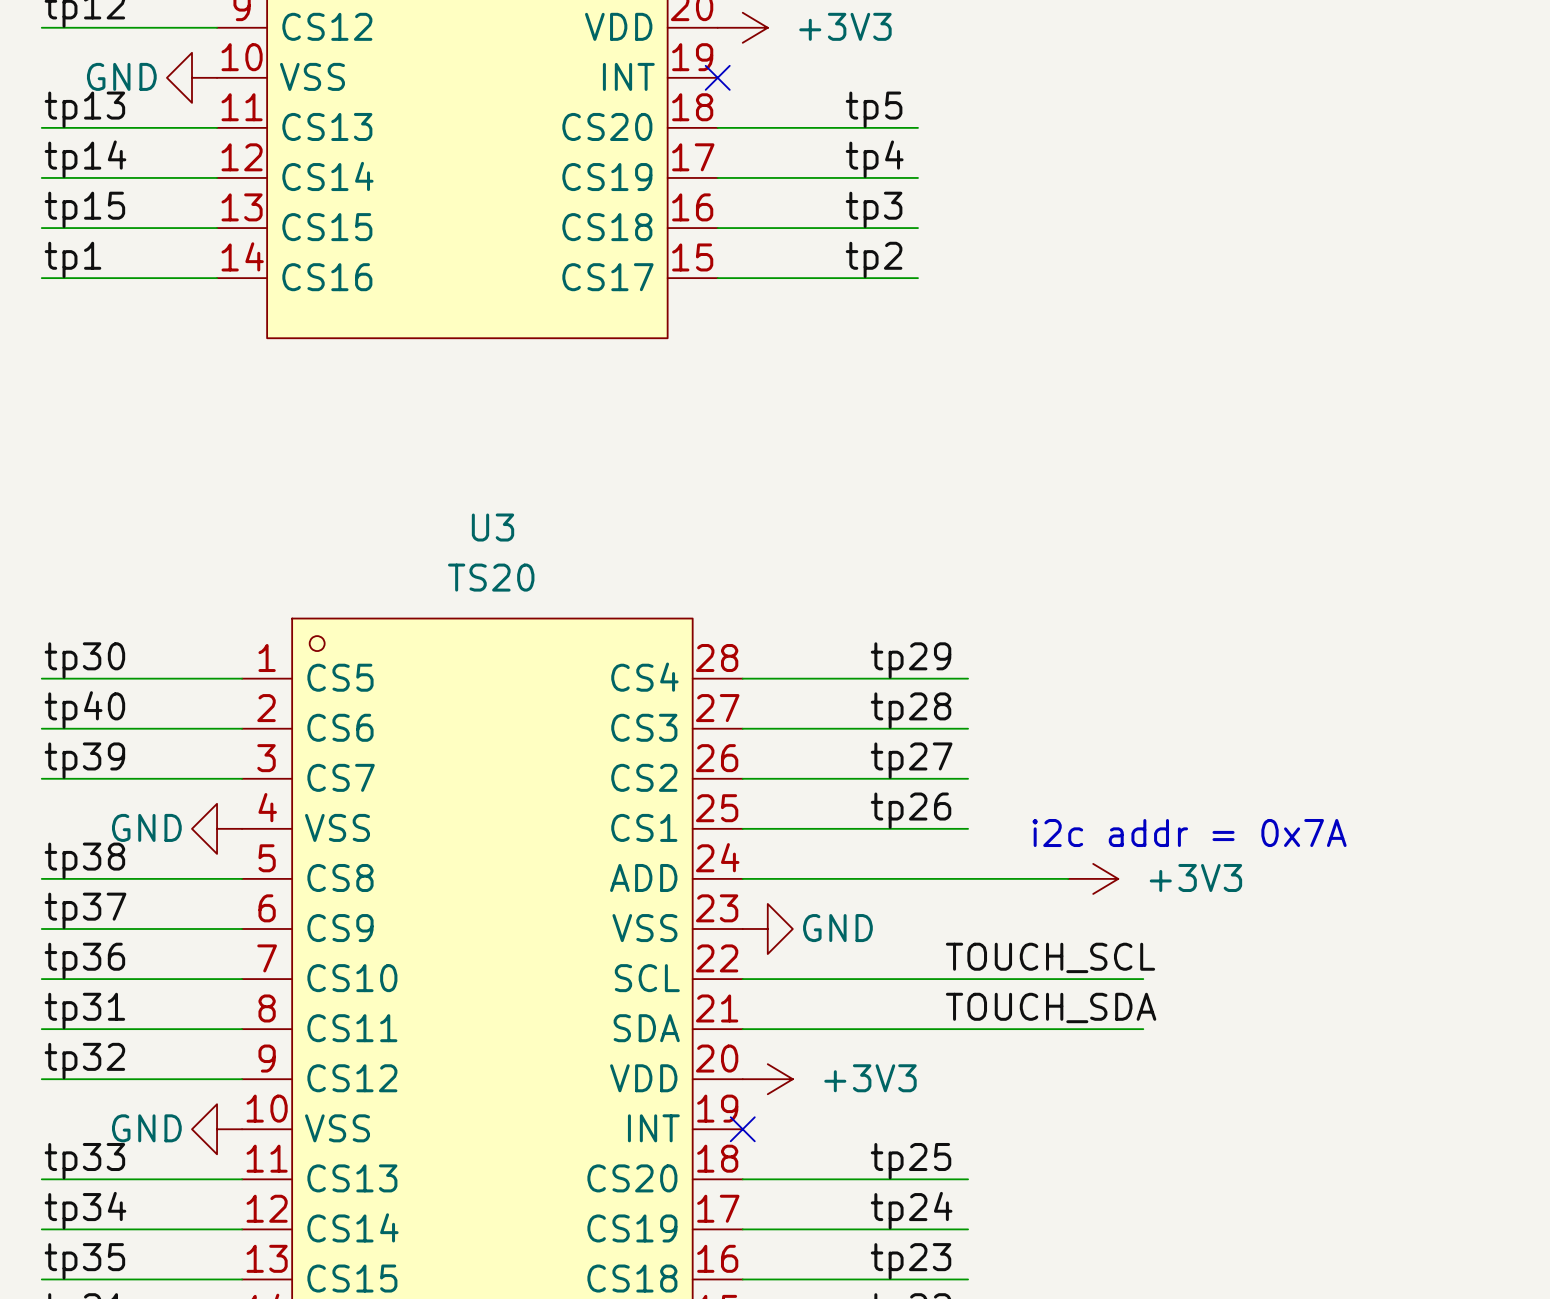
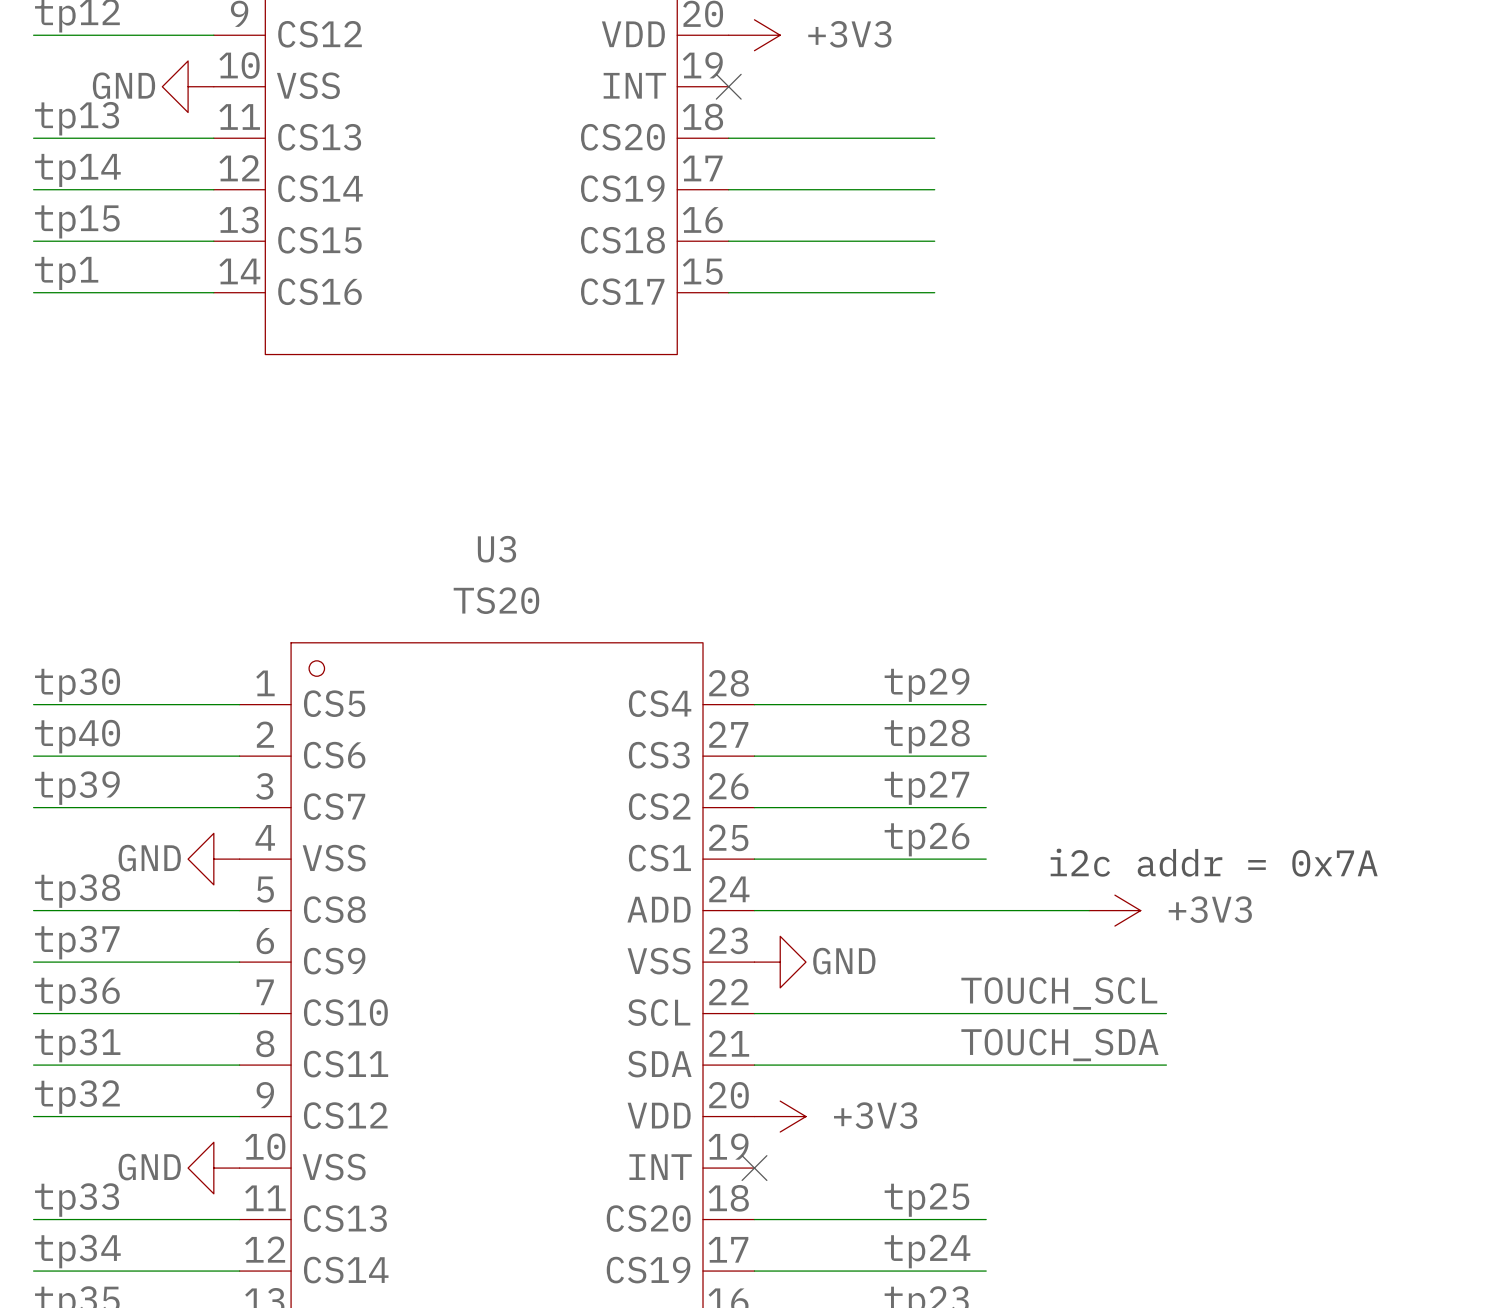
label: tp5 (874, 109) -> none
label: tp4 (874, 159) -> none
label: tp3 (874, 209) -> none
label: tp2 (874, 259) -> none

